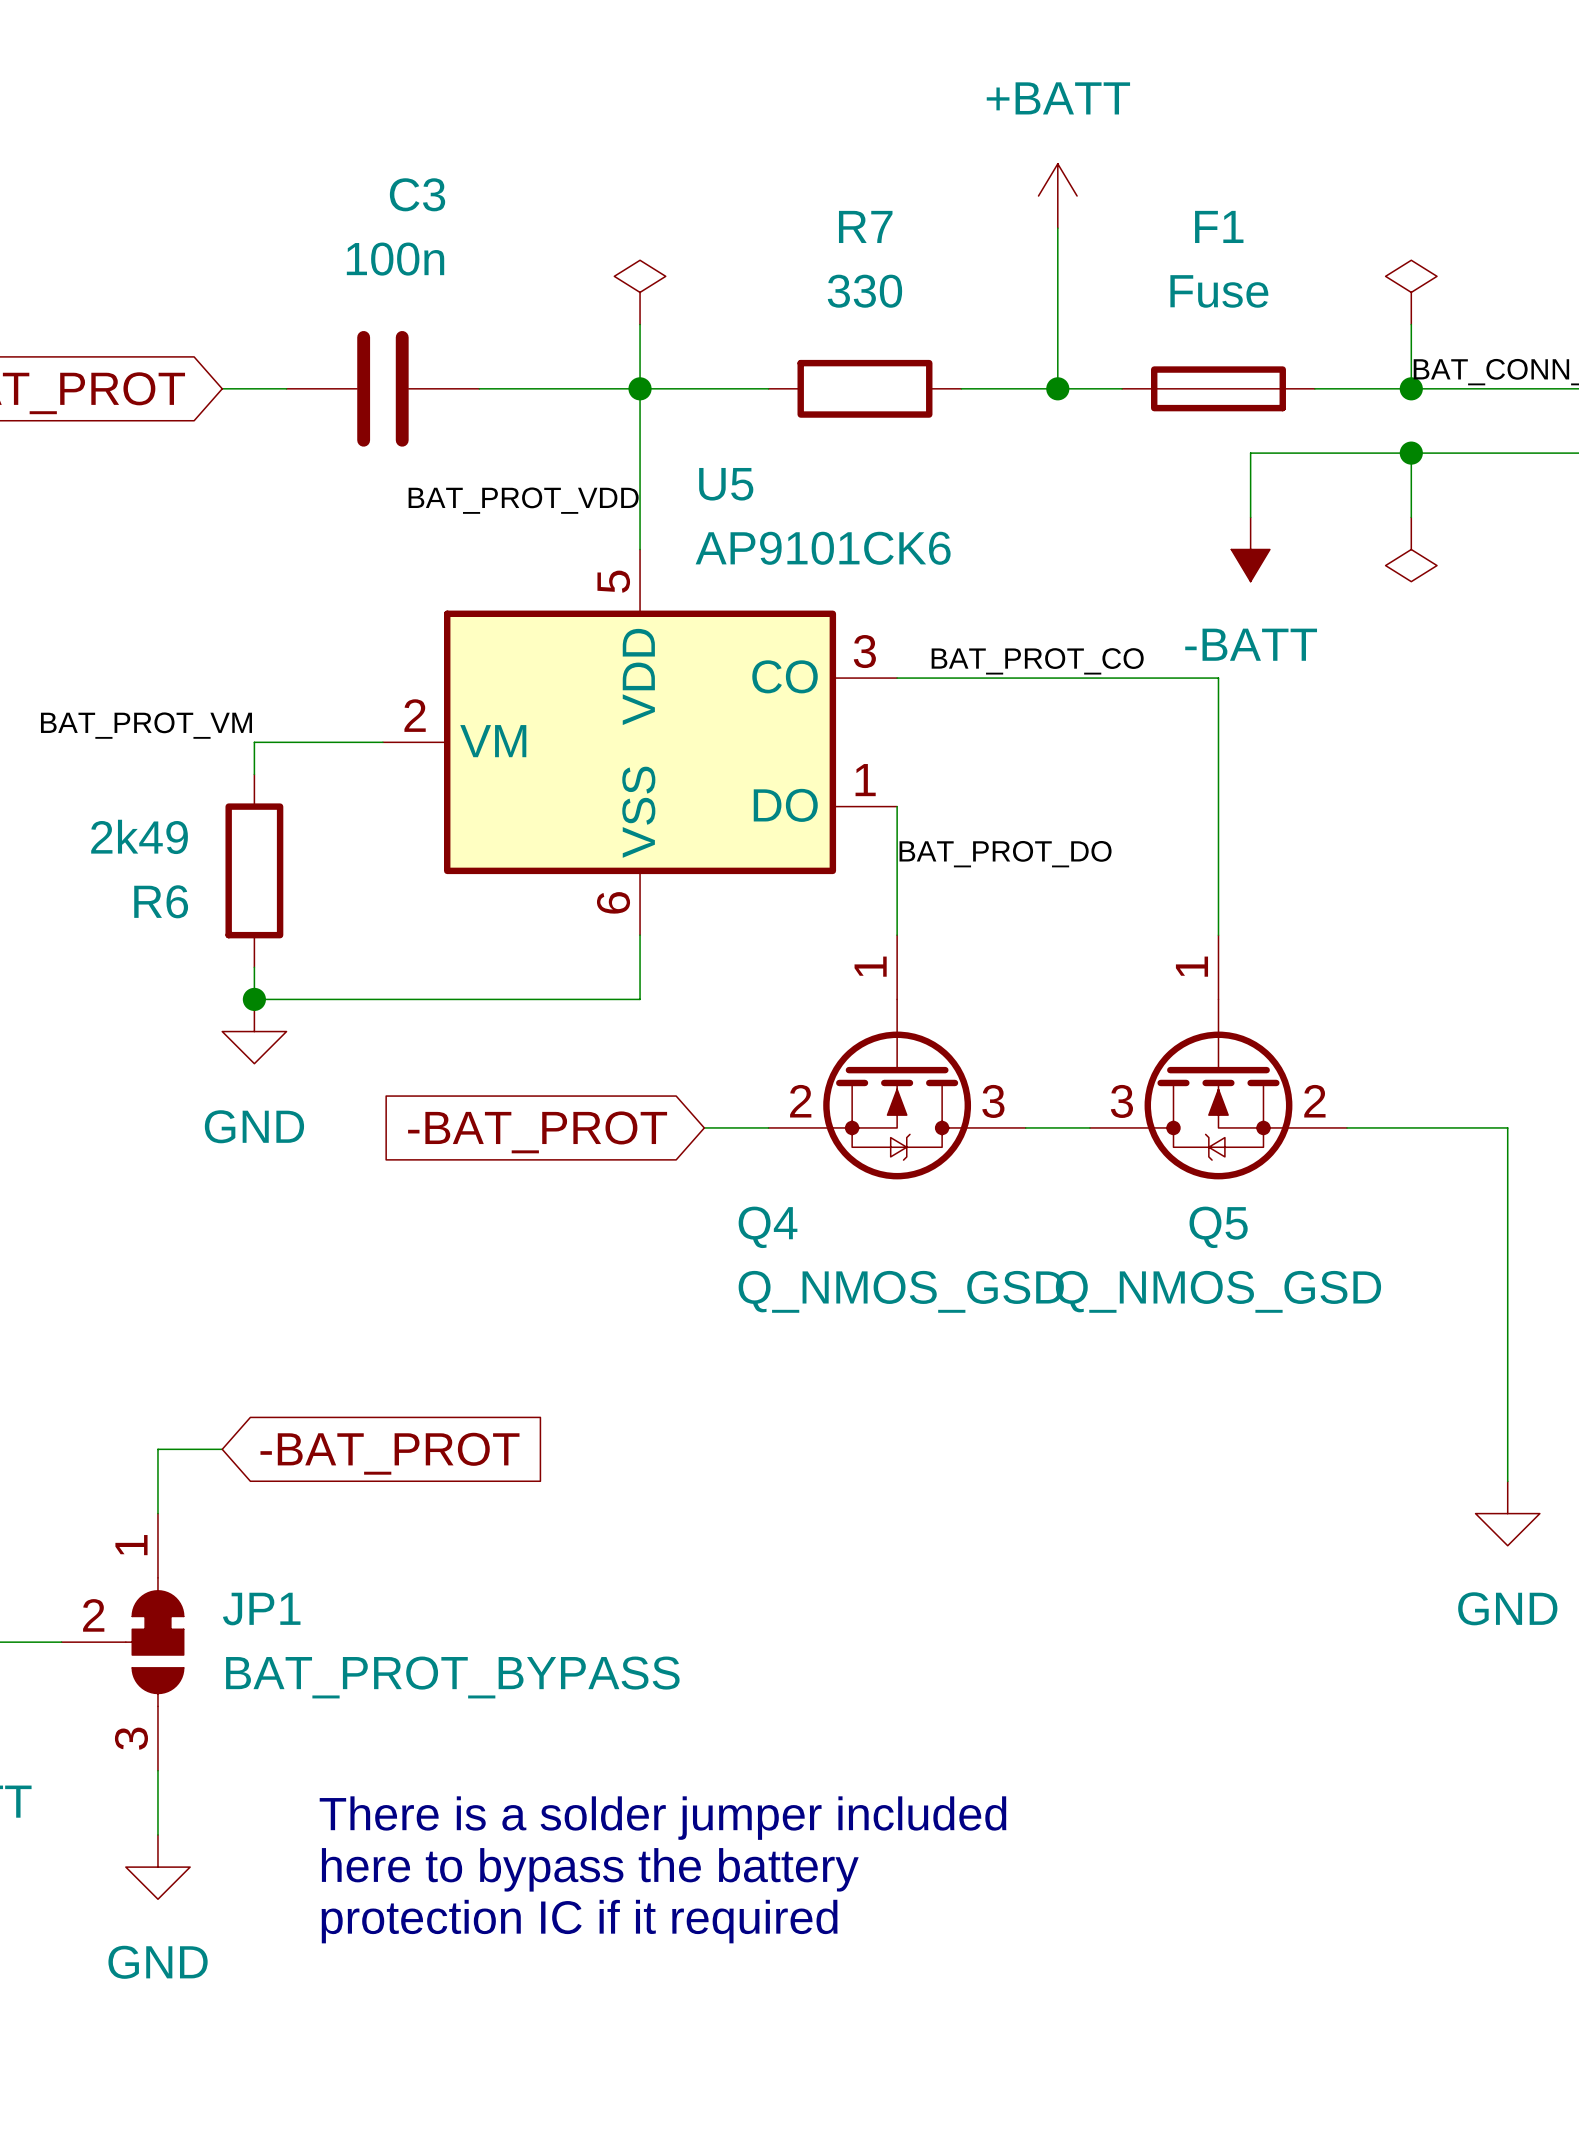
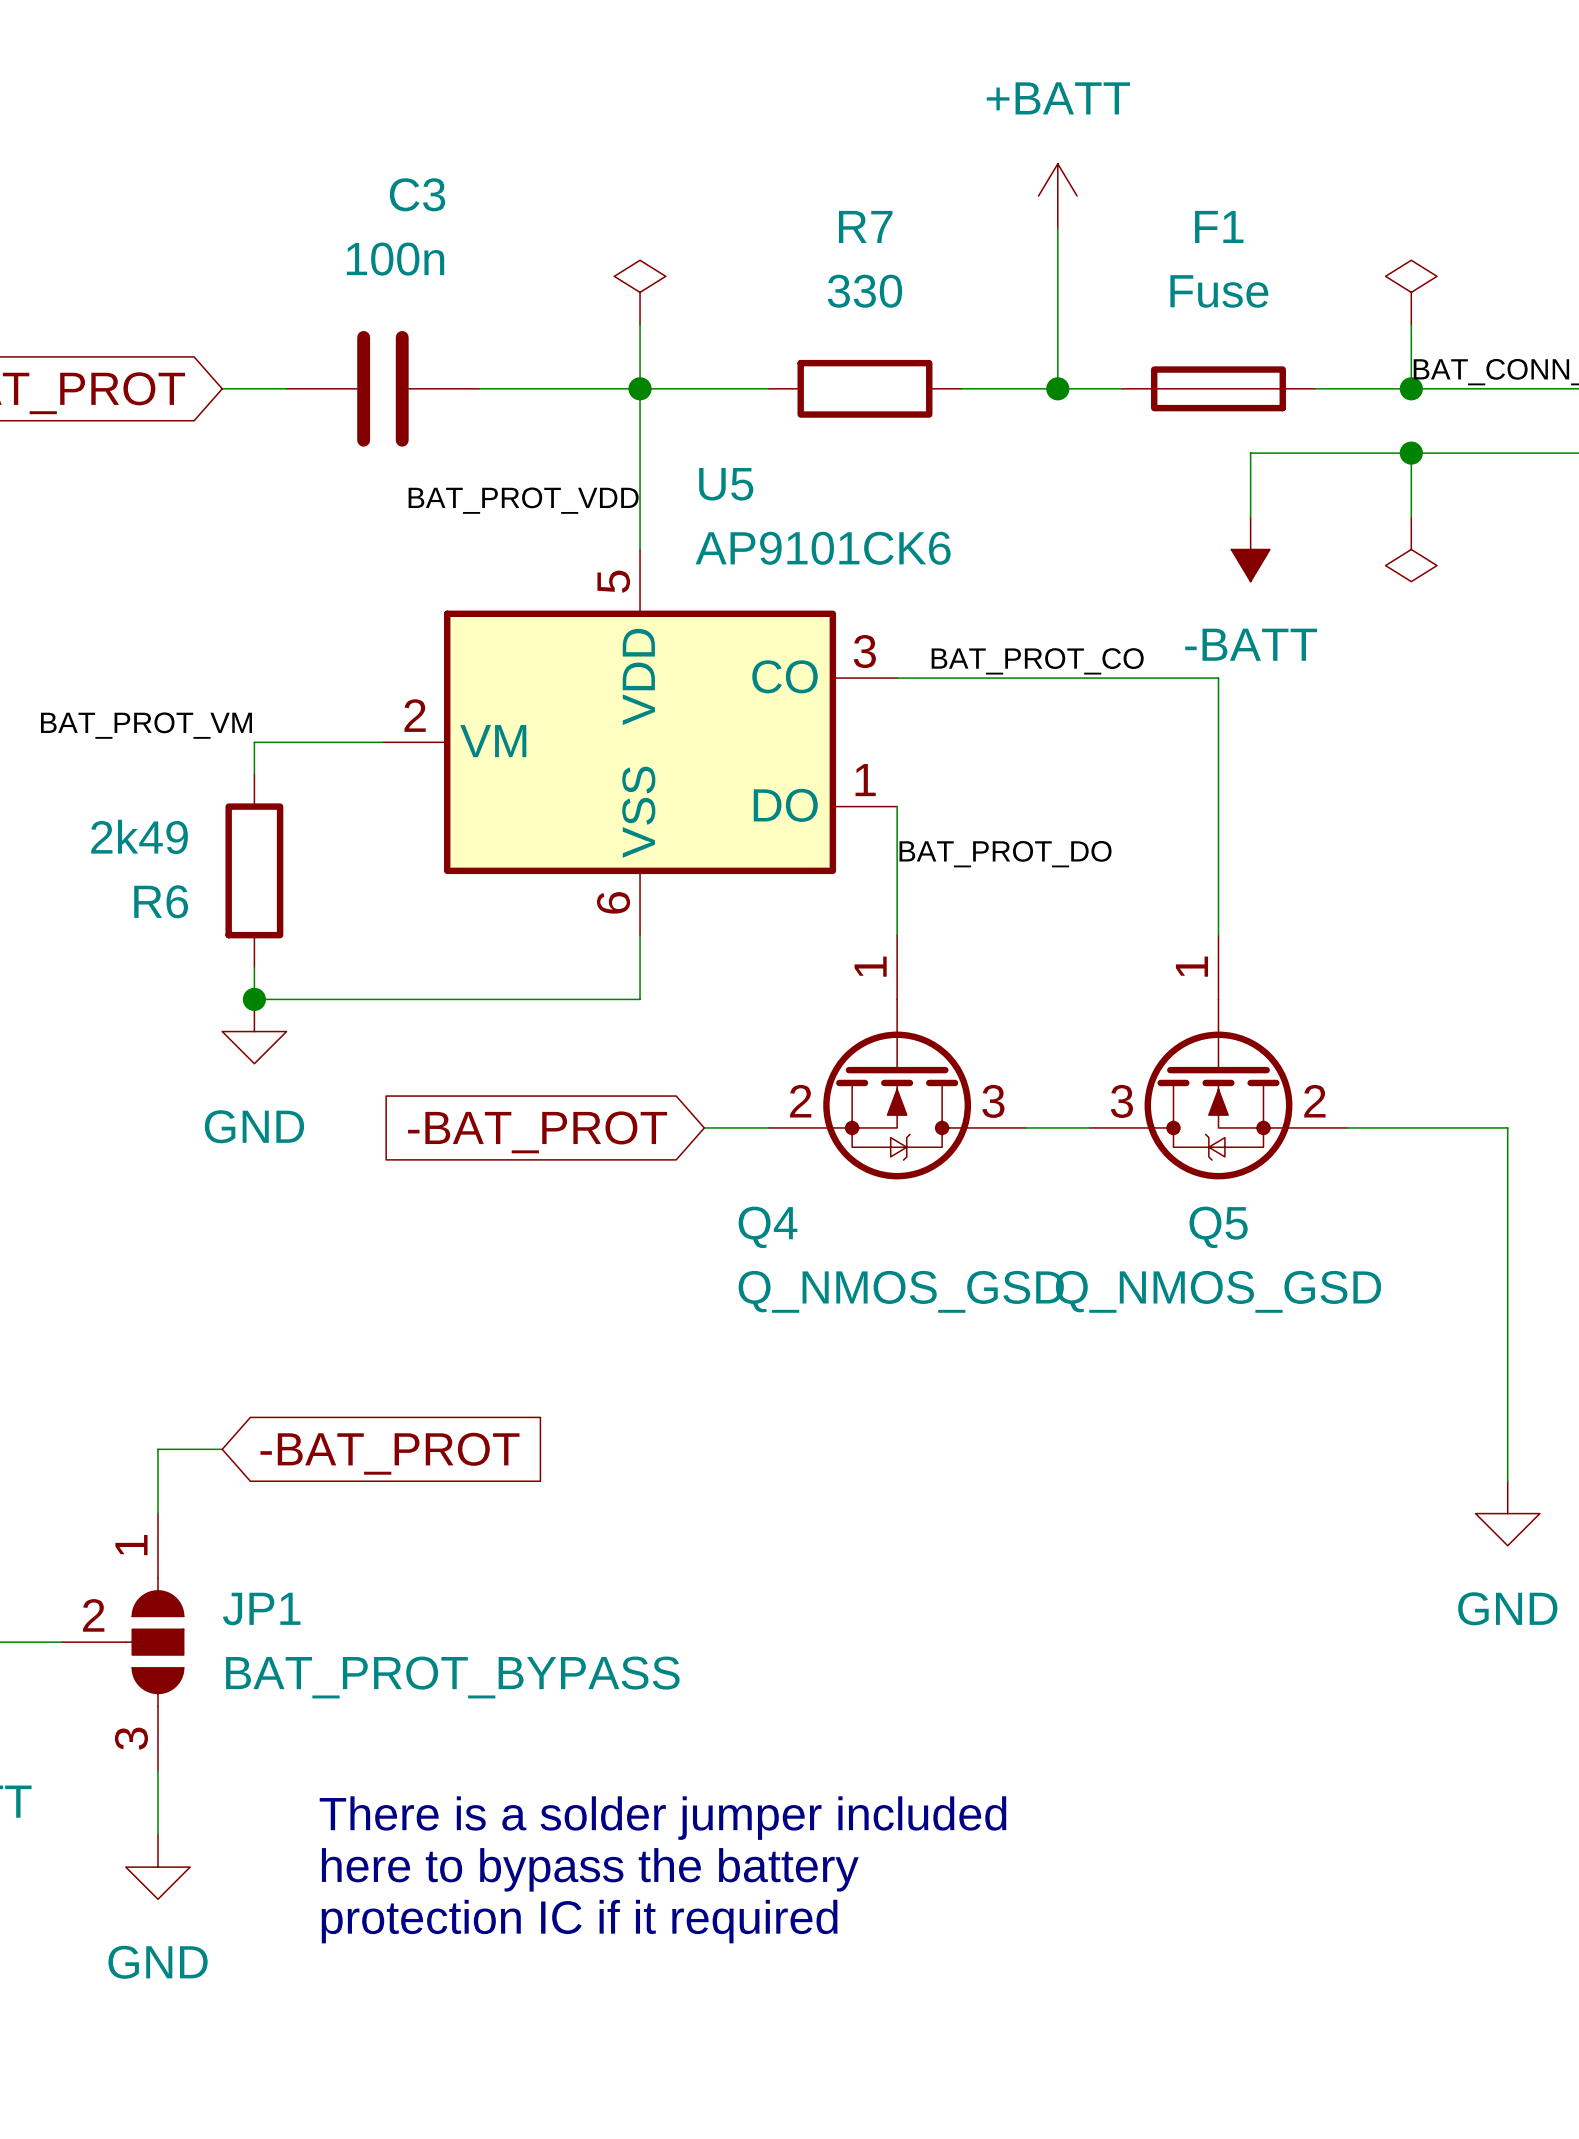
JP1 symbol: [61, 1513, 184, 1771] -> [61, 1513, 184, 1771]

